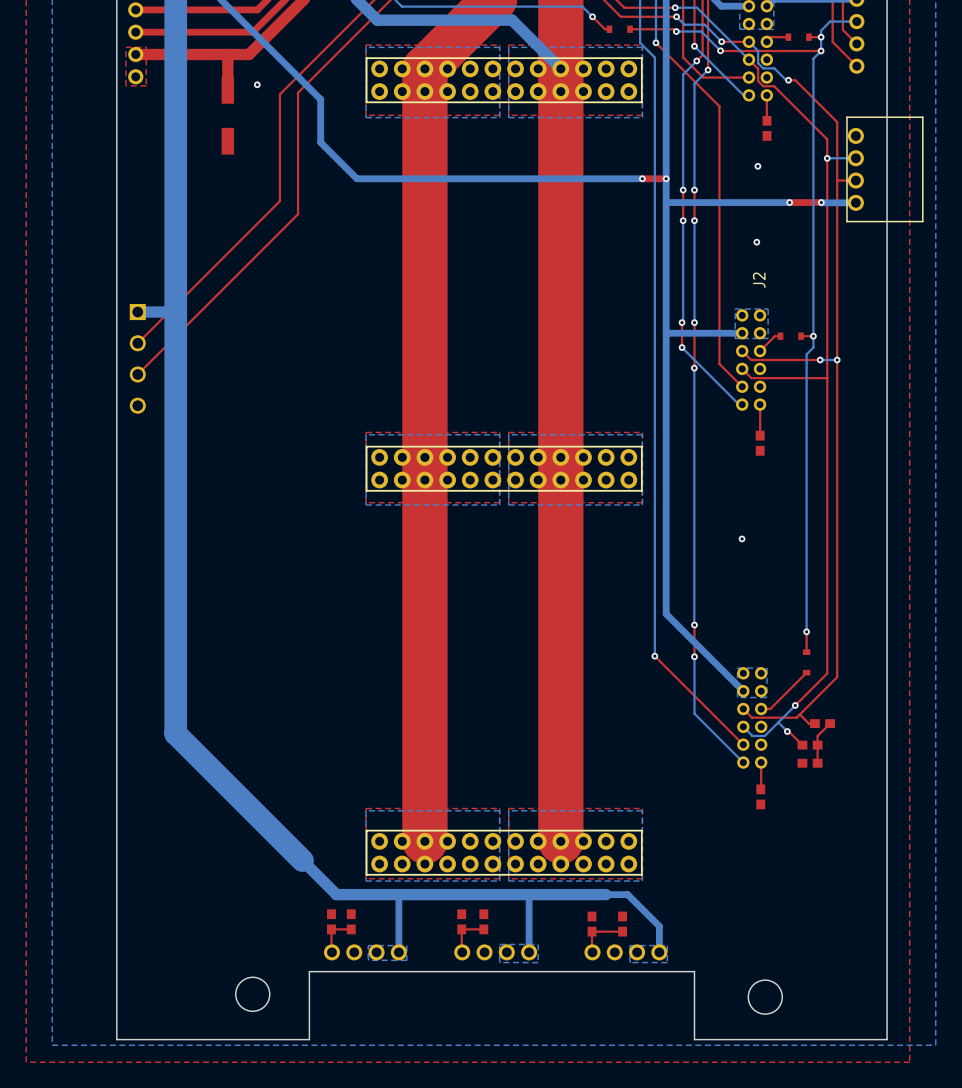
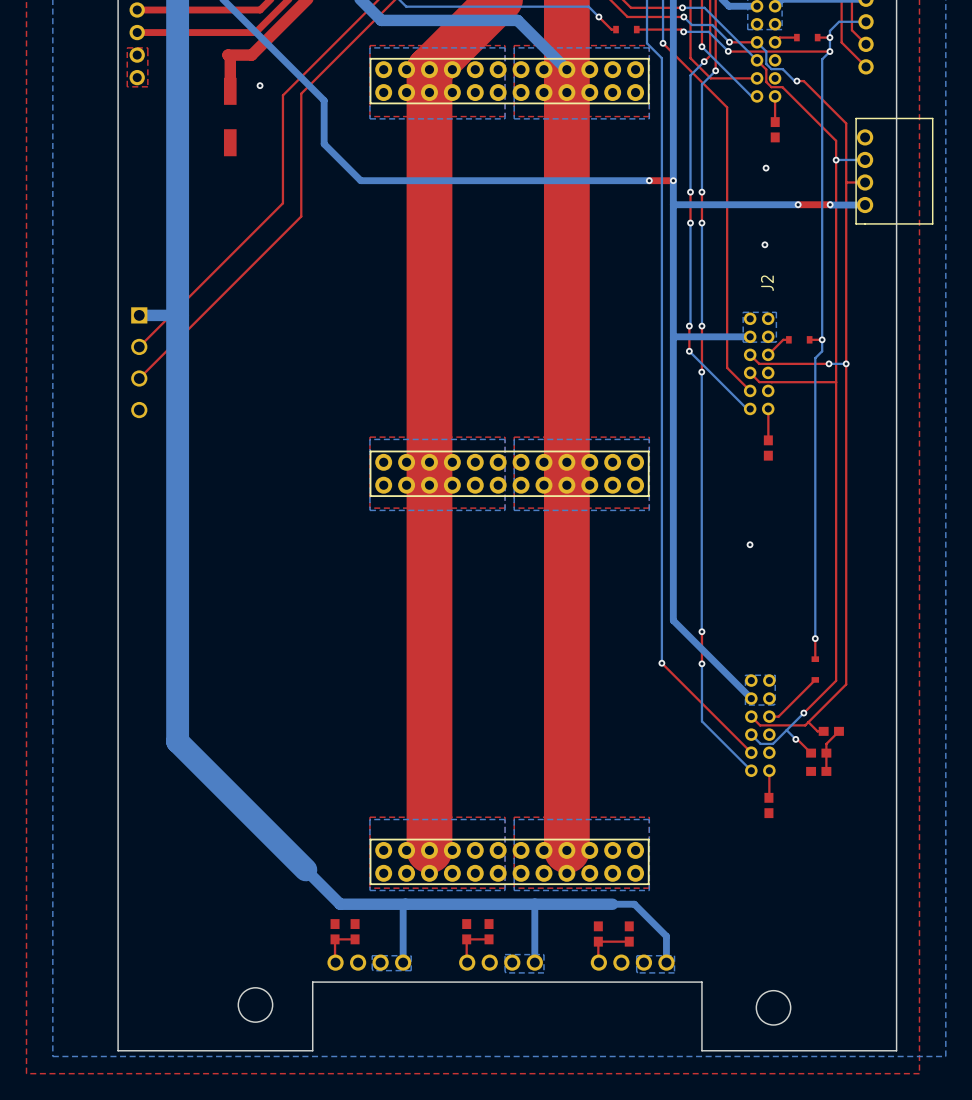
top track: (225, 54) (135, 54) -> none

